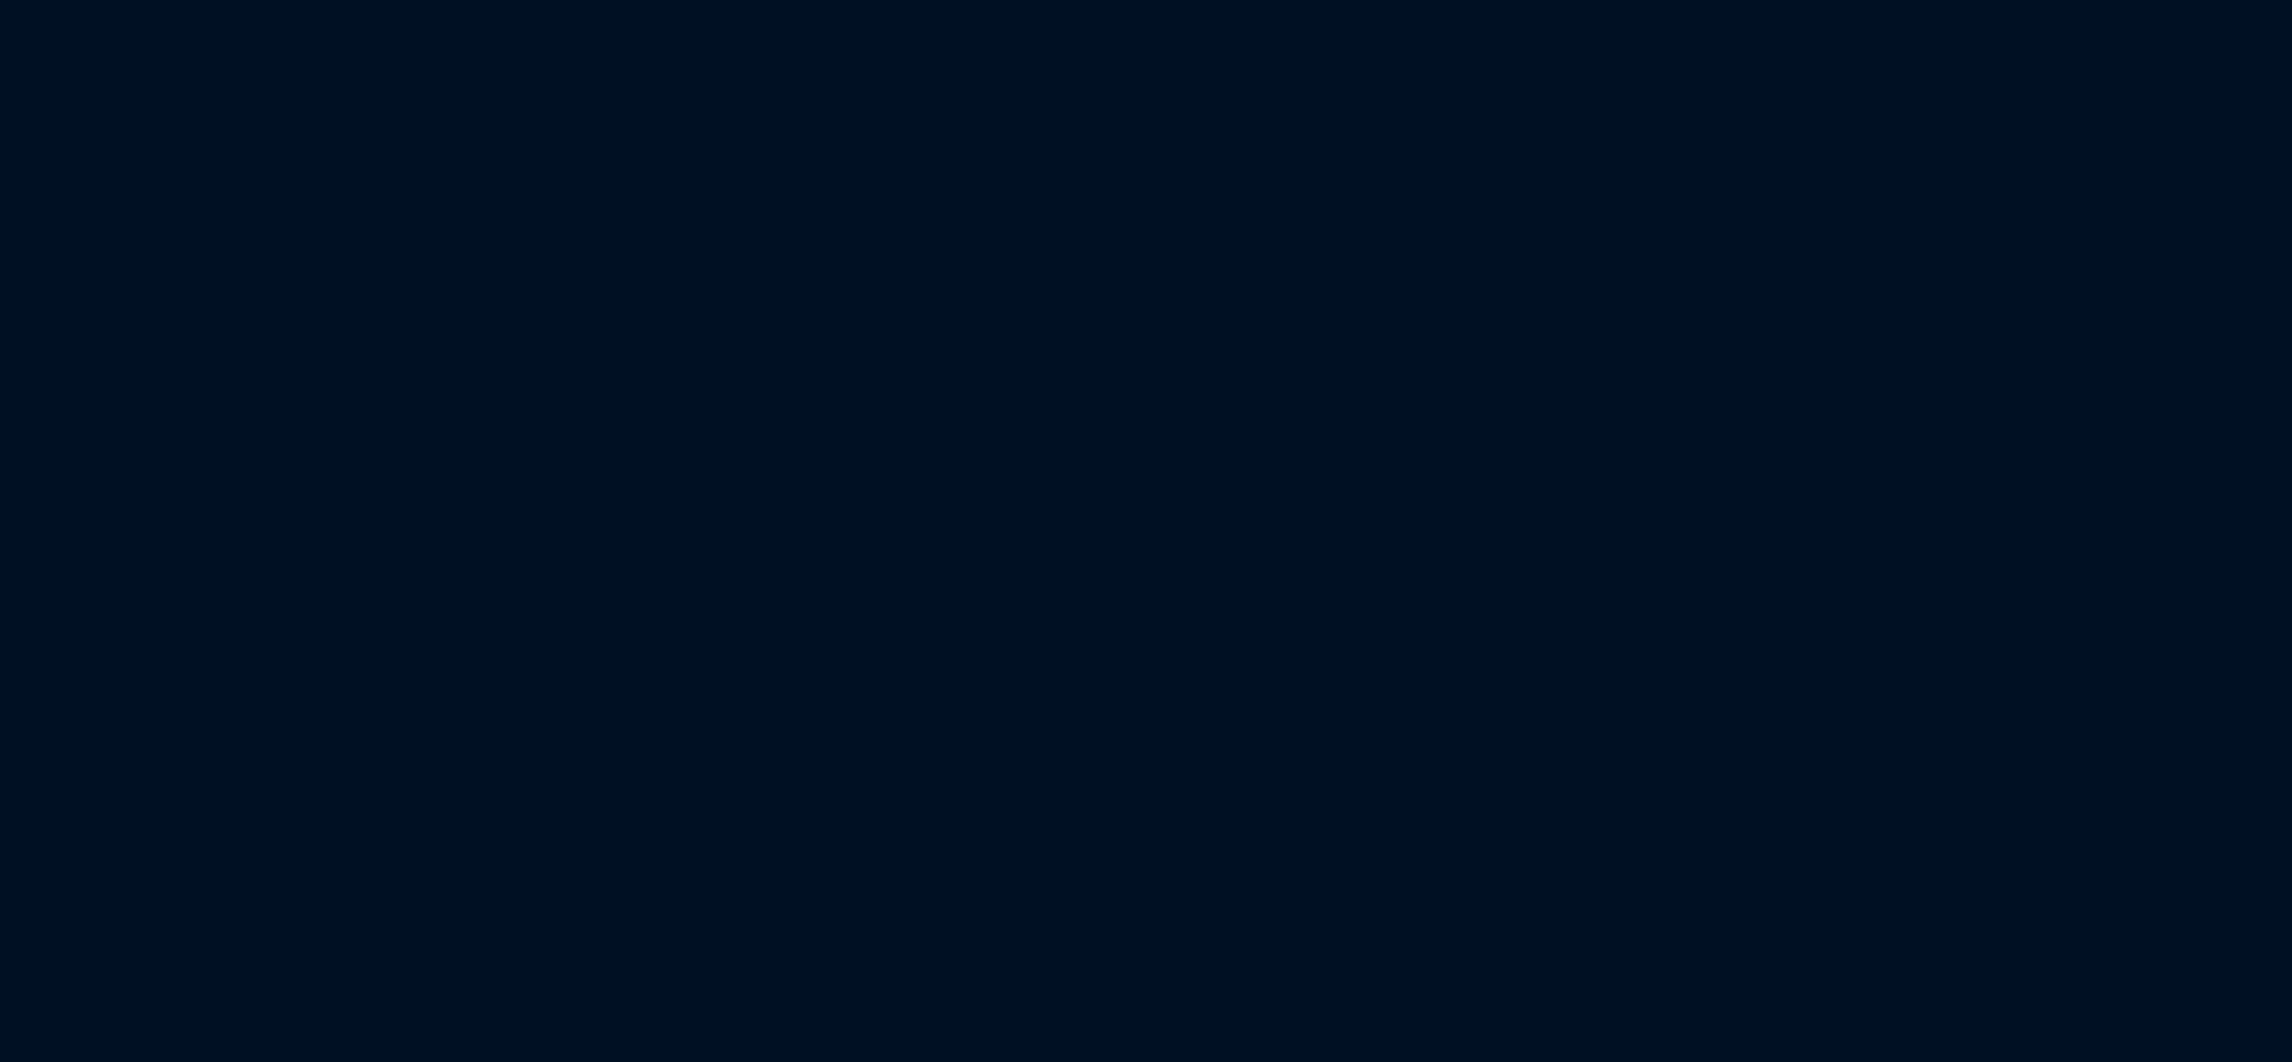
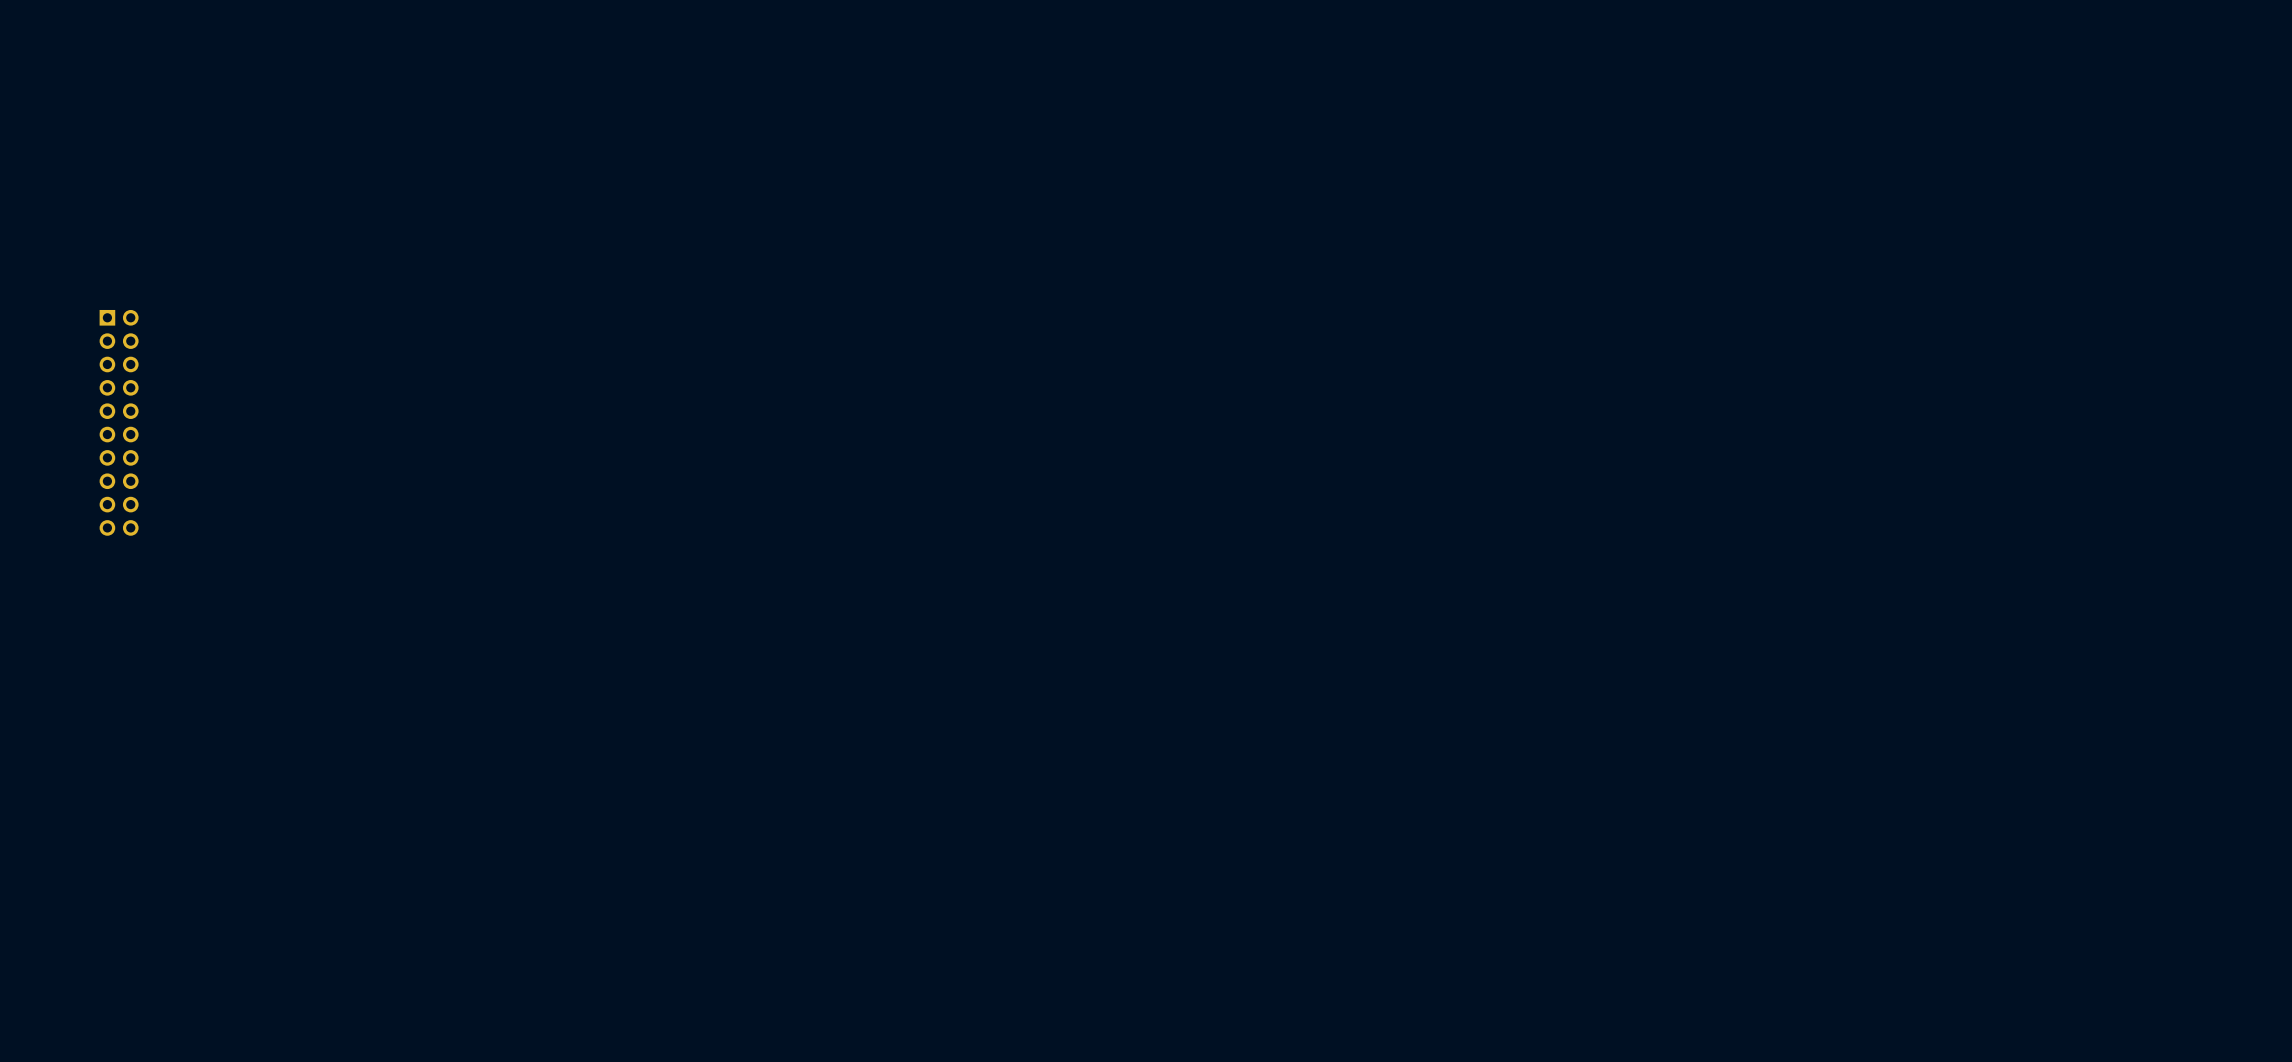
part: none -> (119, 422)

